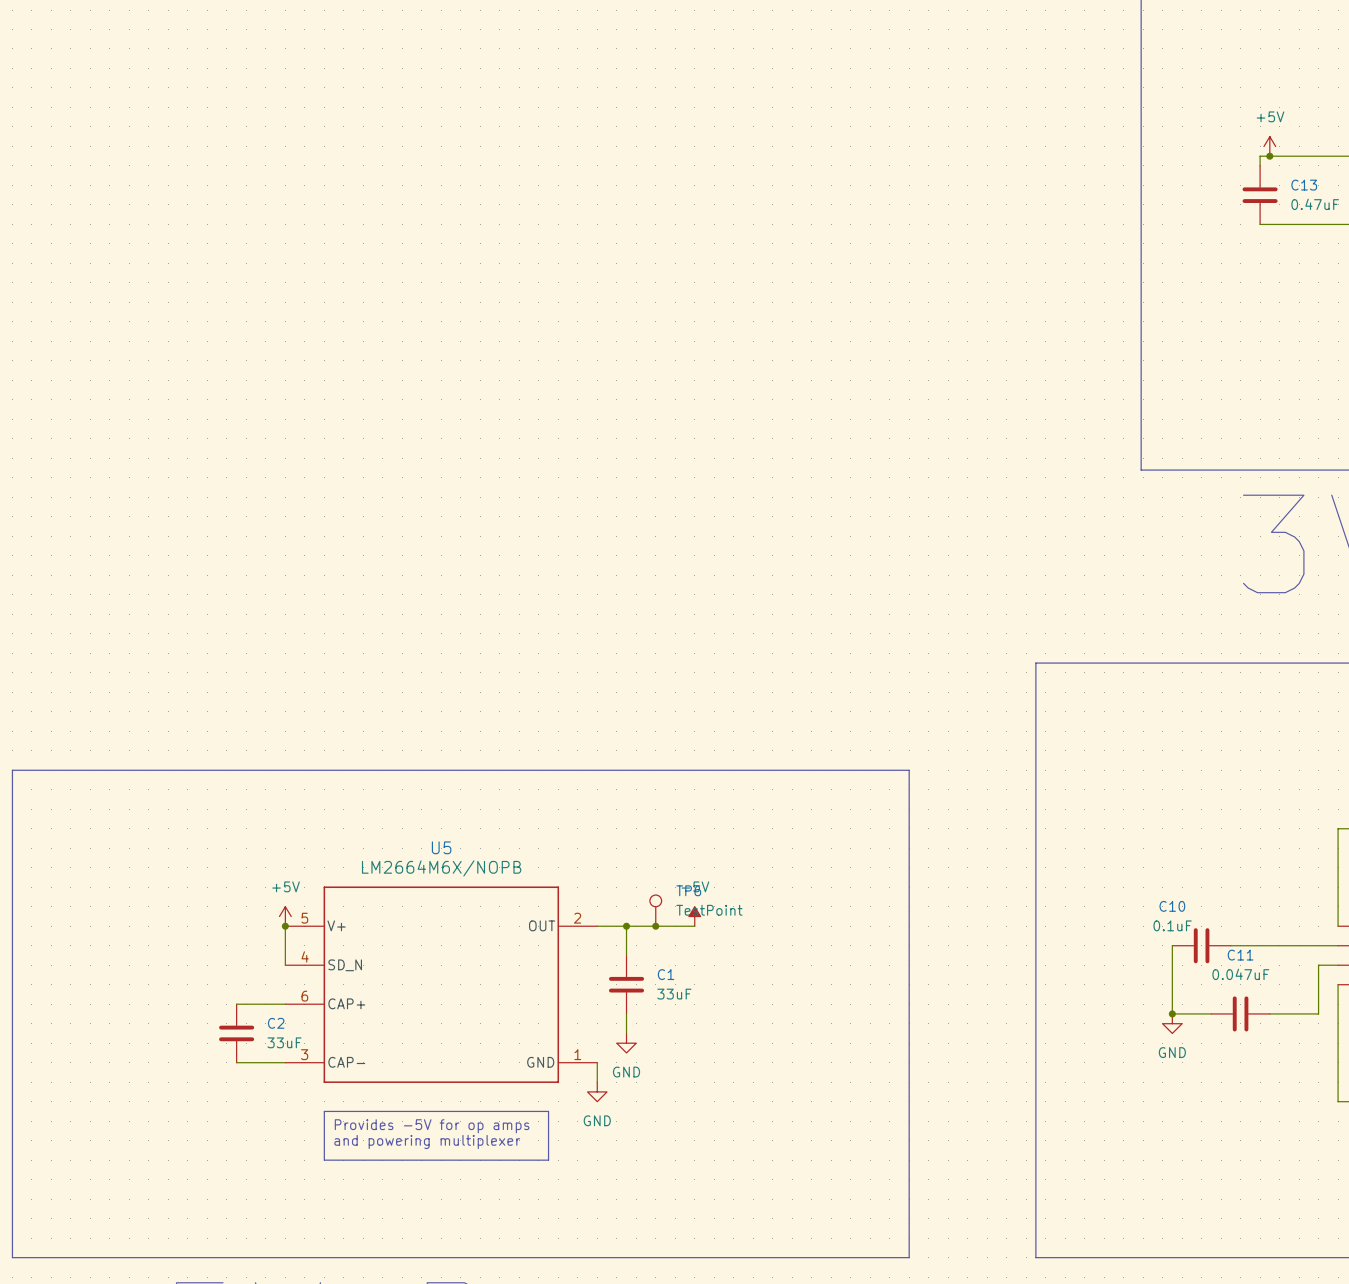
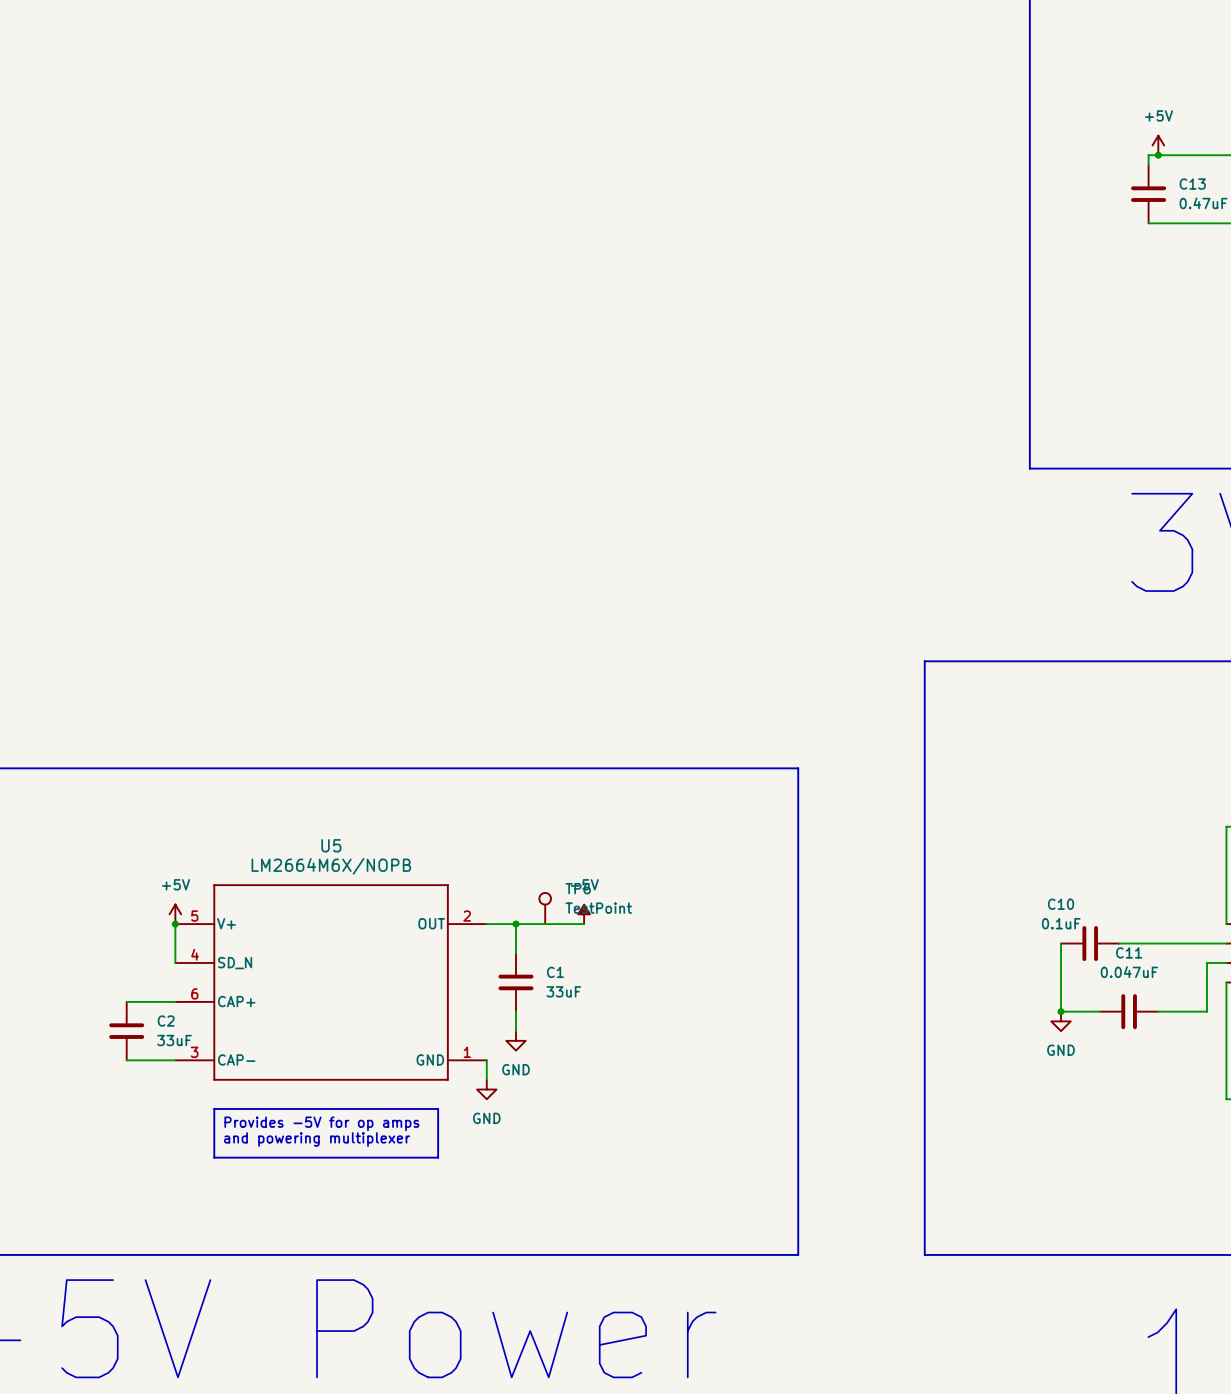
junction: (655, 926) -> none

